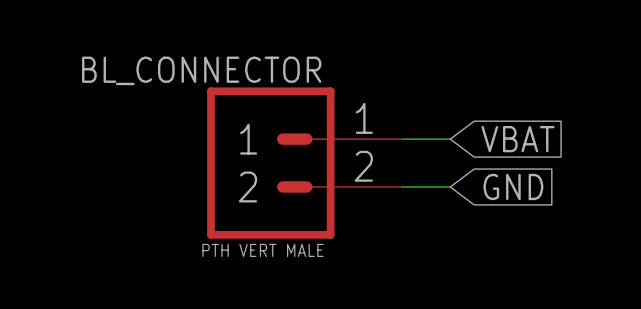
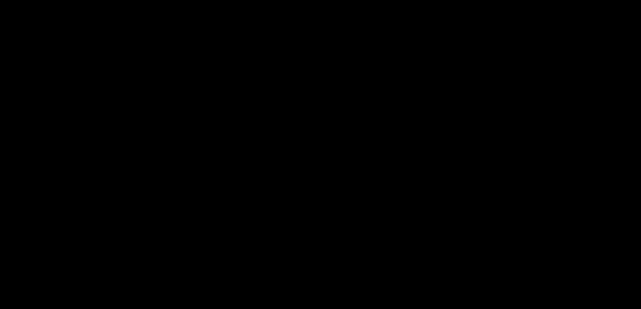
wire: (402, 139) (450, 139) -> none
global label: VBAT (518, 139) -> none
BL_CONNECTOR: PTH VERT MALE (304, 163) -> none
wire: (402, 186) (450, 186) -> none
global label: GND (513, 186) -> none

